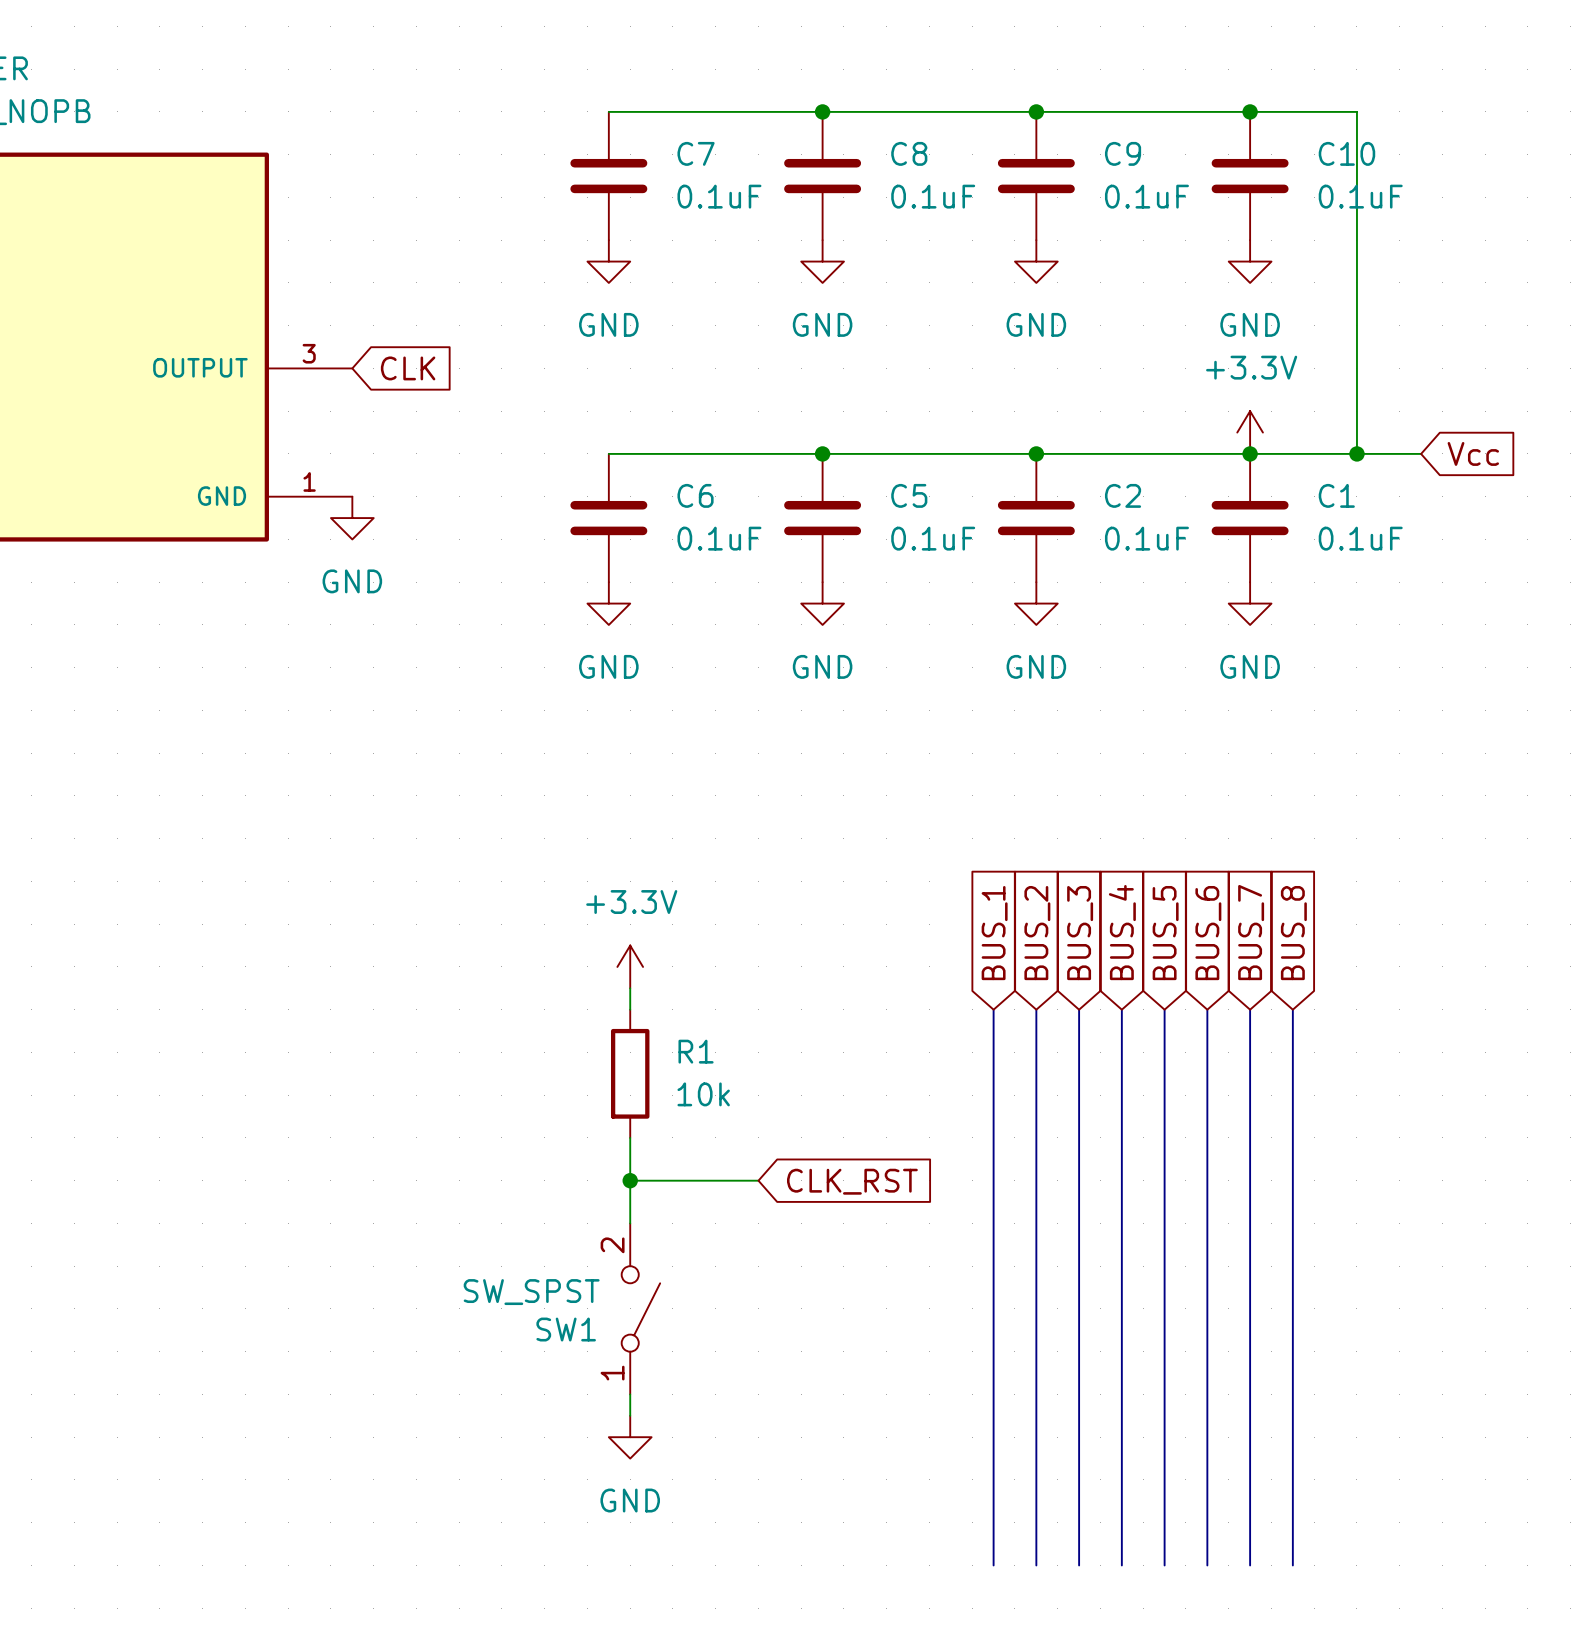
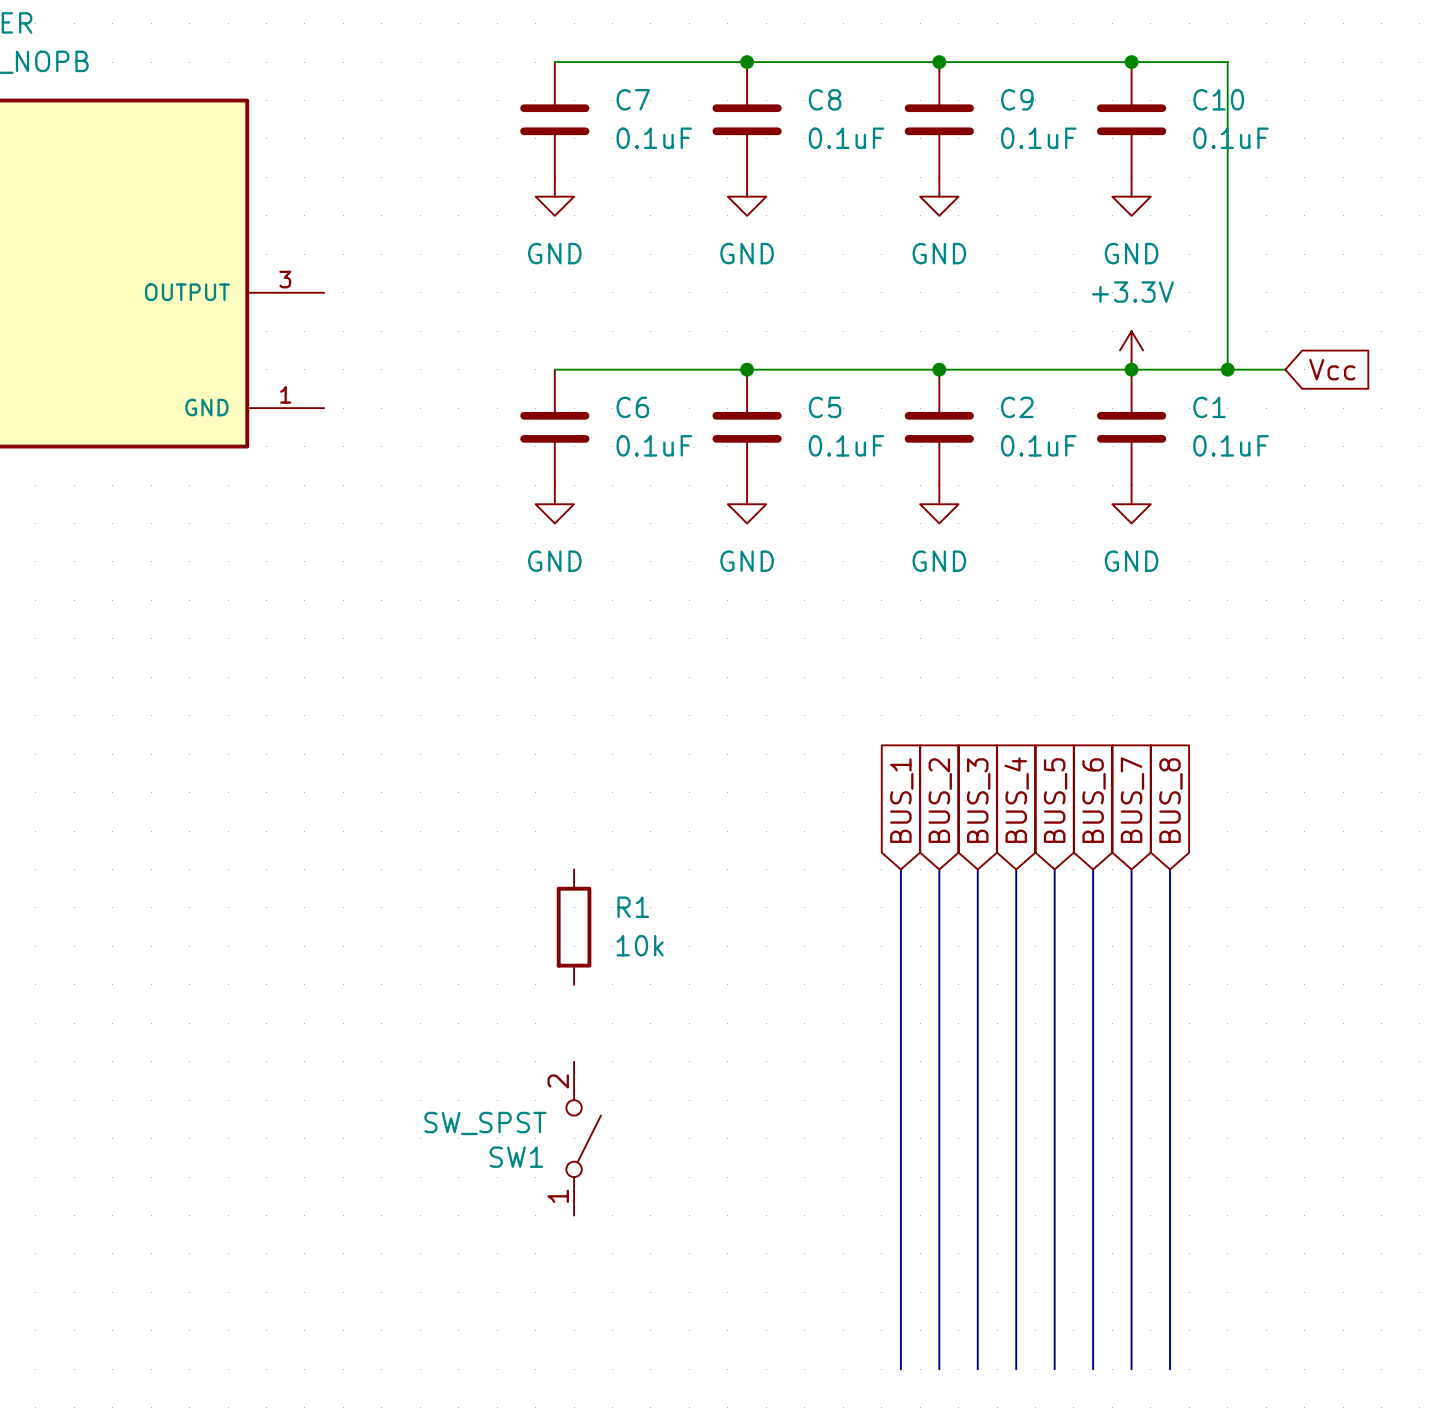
global label: CLK (408, 368) -> none
power symbol: GND (352, 518) -> none
power symbol: +3.3V (630, 966) -> none
wire: (630, 988) (630, 1009) -> none
wire: (630, 1137) (630, 1223) -> none
wire: (630, 1180) (758, 1180) -> none
junction: (630, 1180) -> none
global label: CLK_RST (852, 1181) -> none
wire: (630, 1394) (630, 1415) -> none
power symbol: GND (630, 1437) -> none

